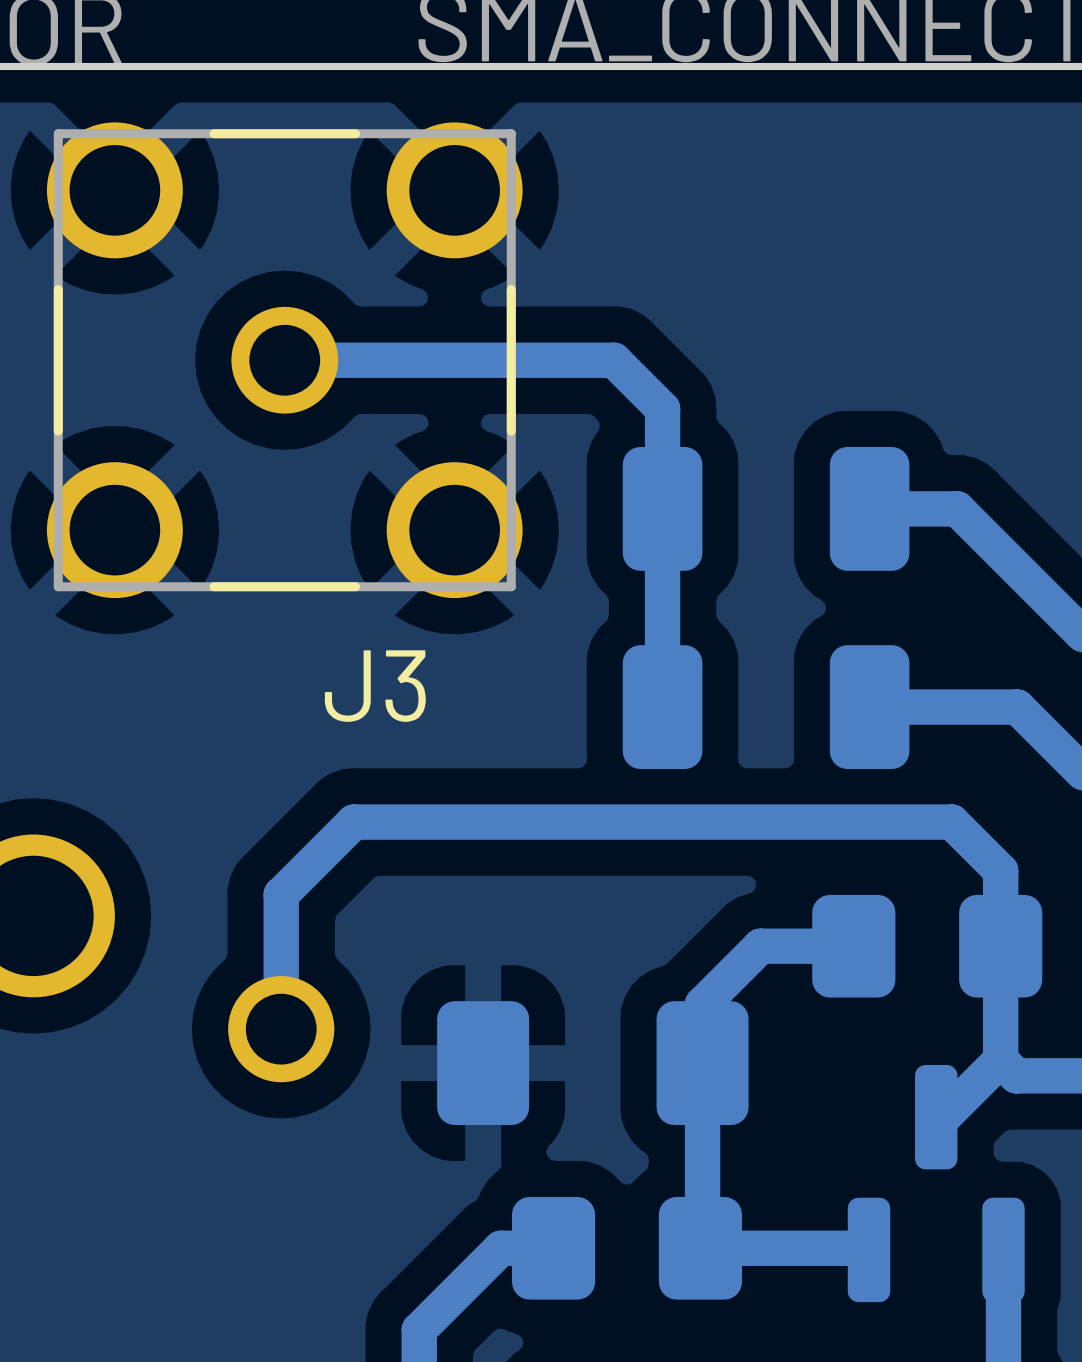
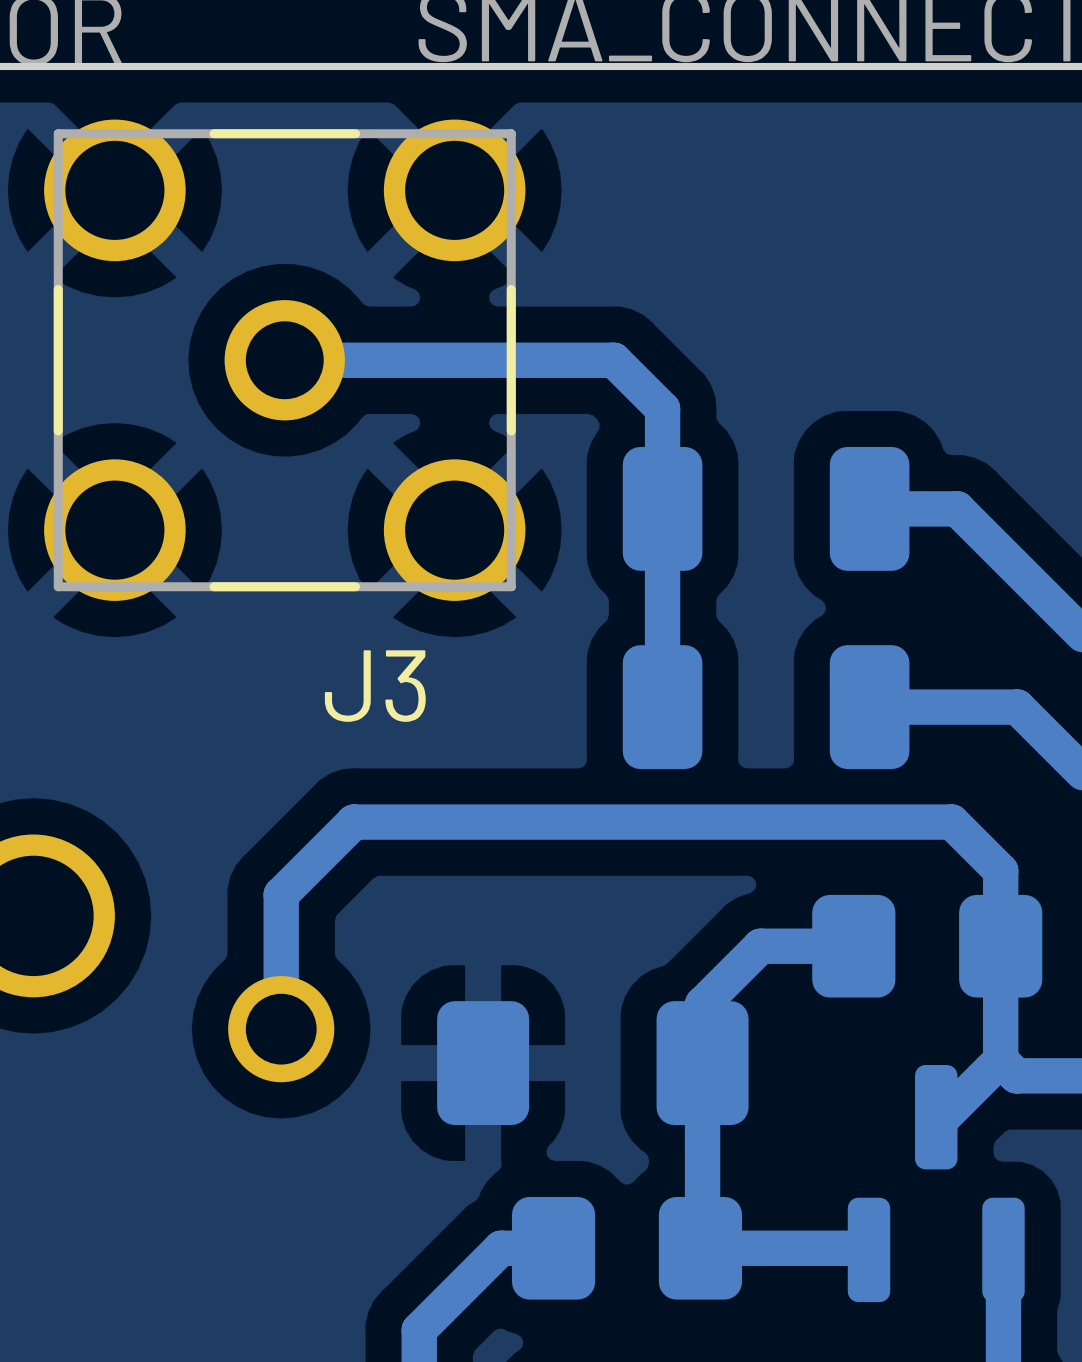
J3 footprint: [46, 122, 523, 599] -> [44, 119, 526, 601]

